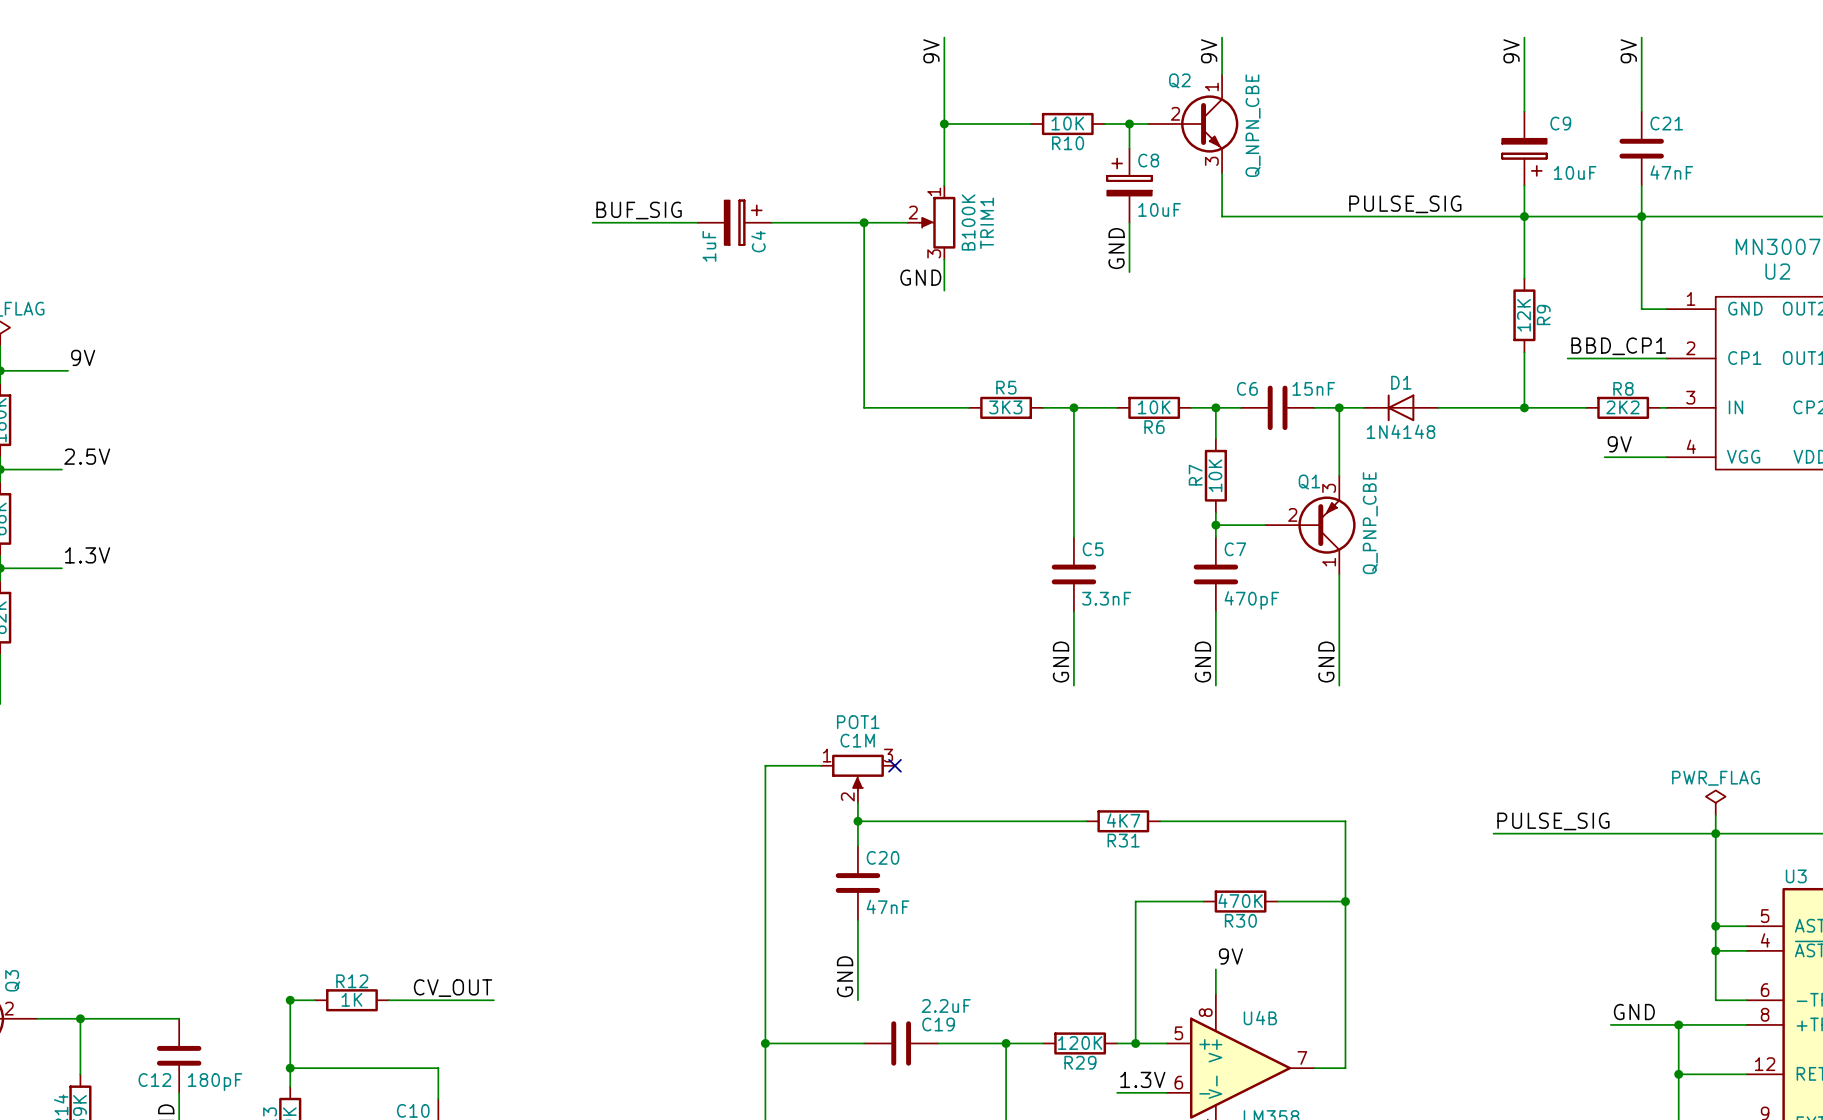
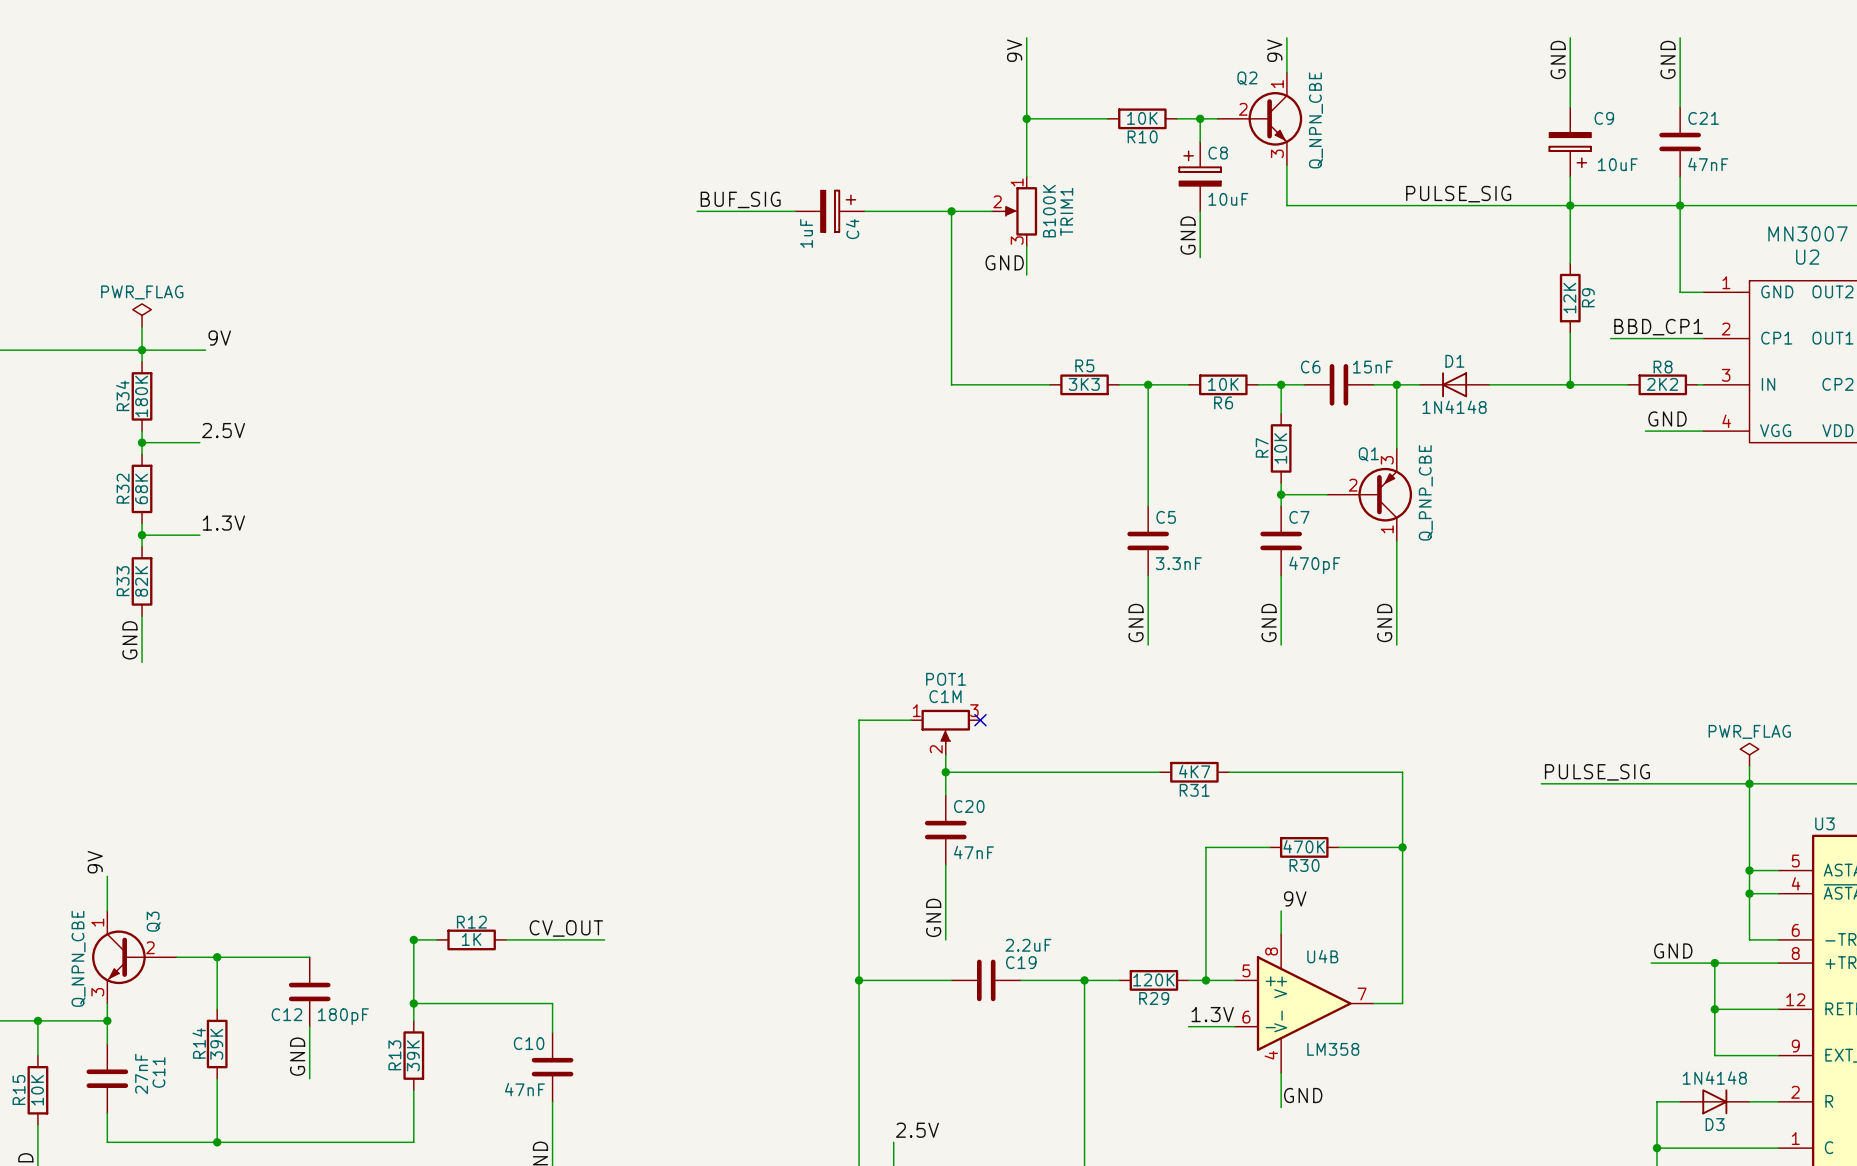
label: 9V (1511, 51) -> GND (1558, 59)
label: 9V (1628, 51) -> GND (1668, 59)
label: 9V (1619, 444) -> GND (1667, 418)

